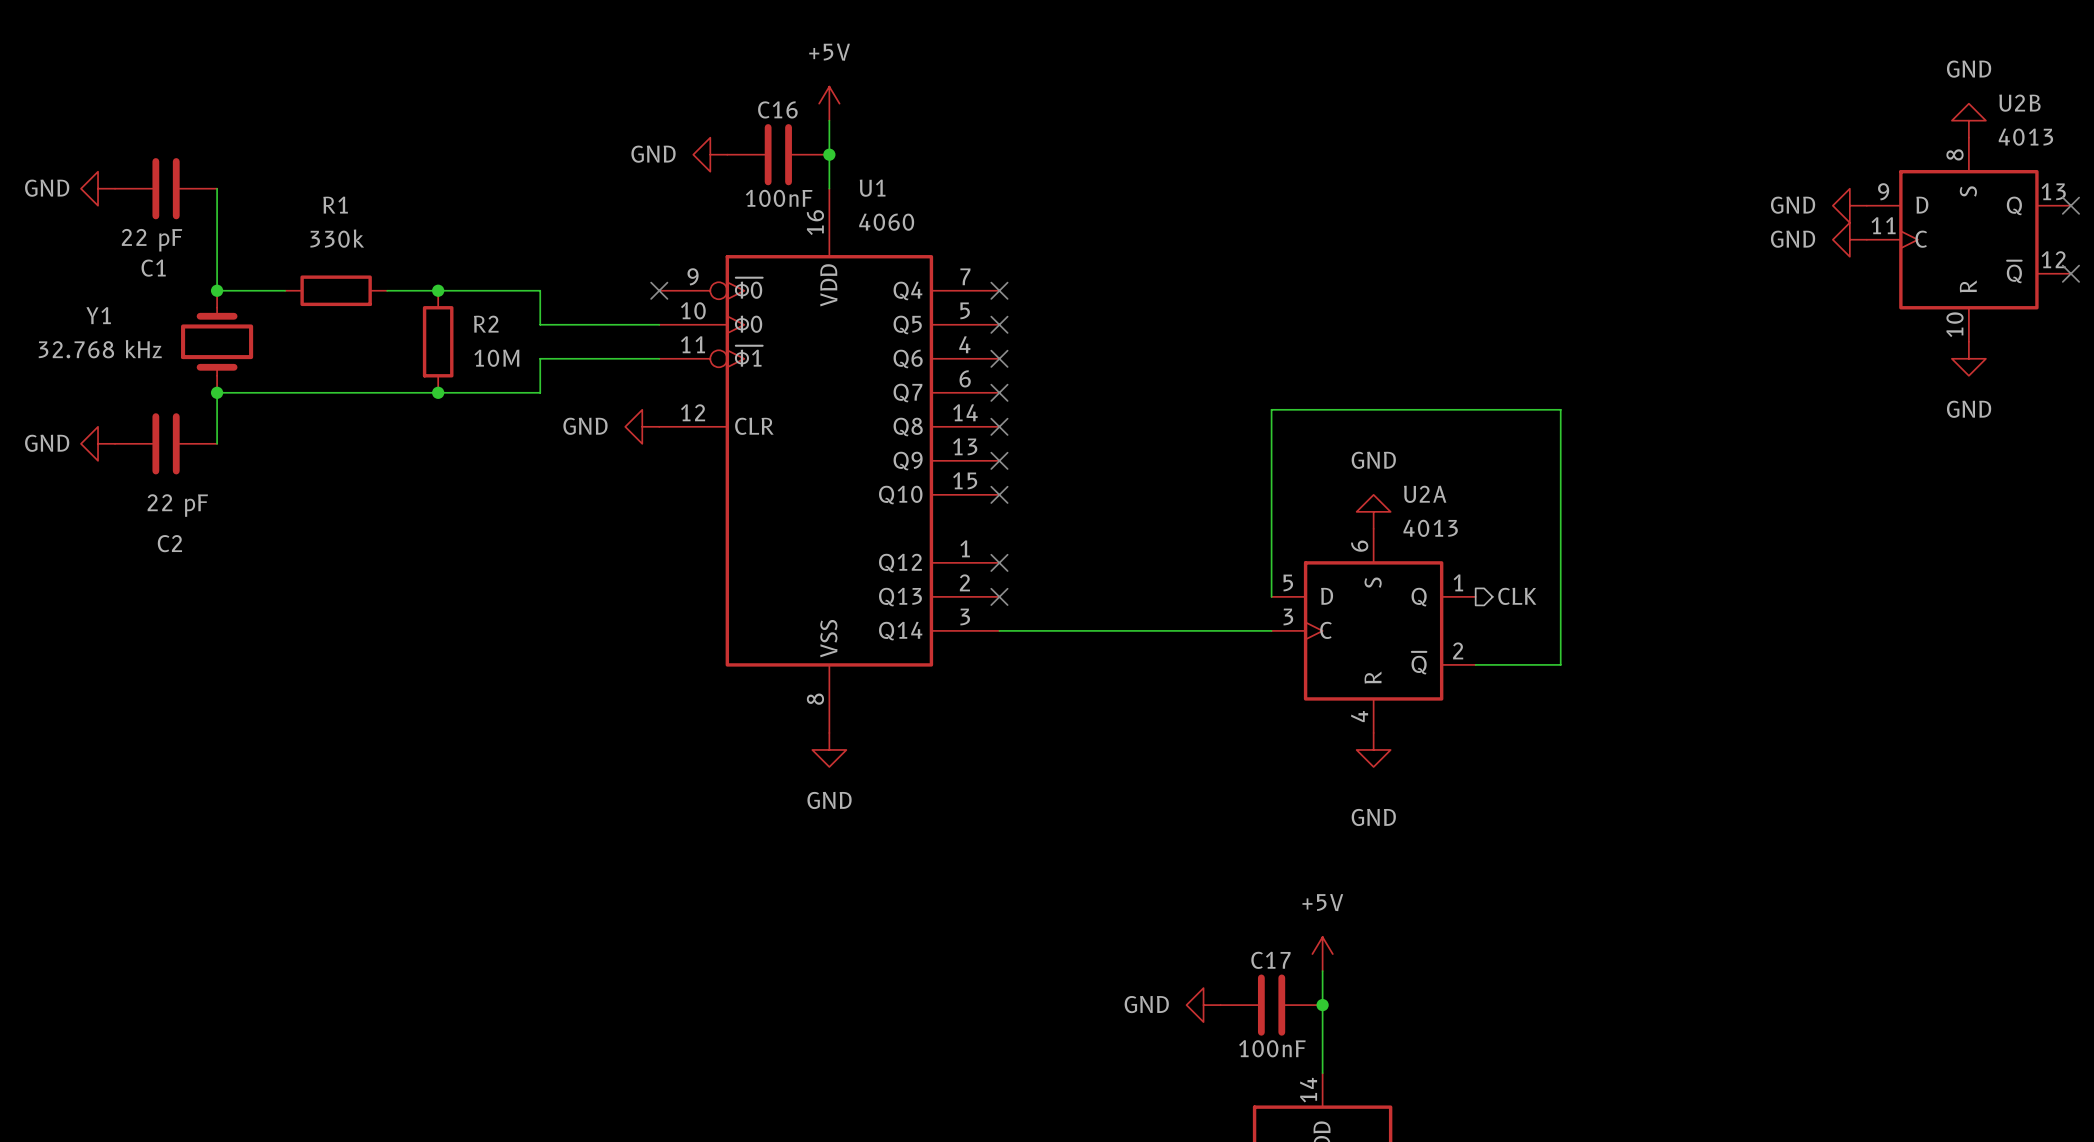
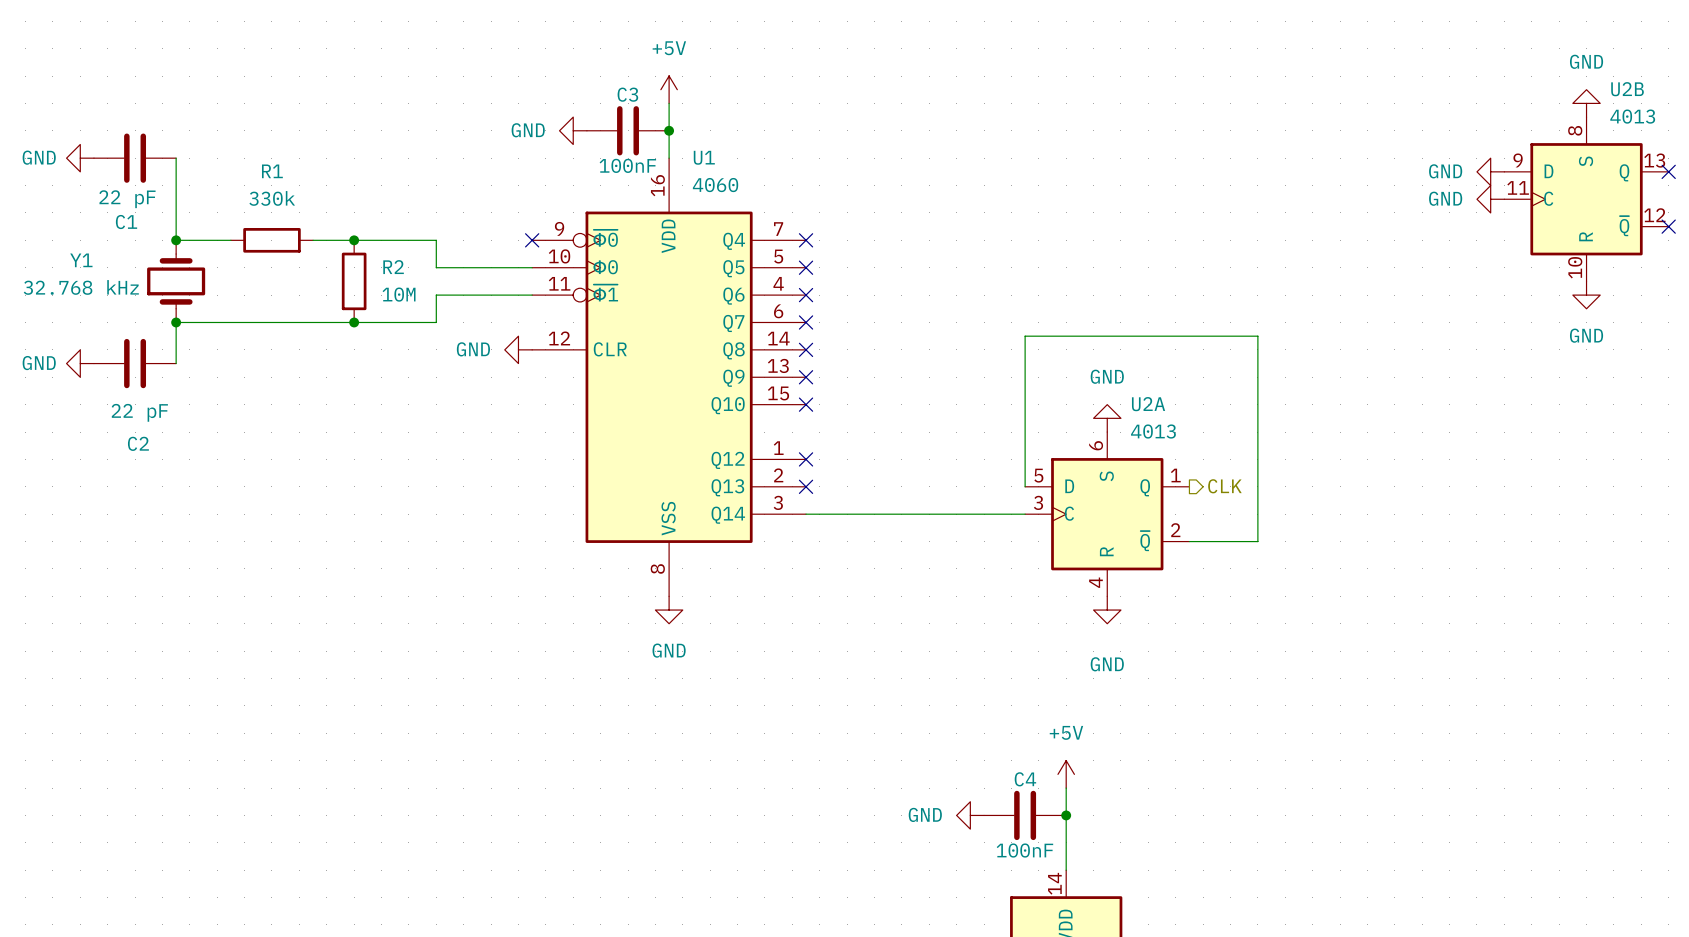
C16 name: C16 (777, 109) -> C3 (627, 94)
C17 name: C17 (1270, 960) -> C4 (1025, 779)

